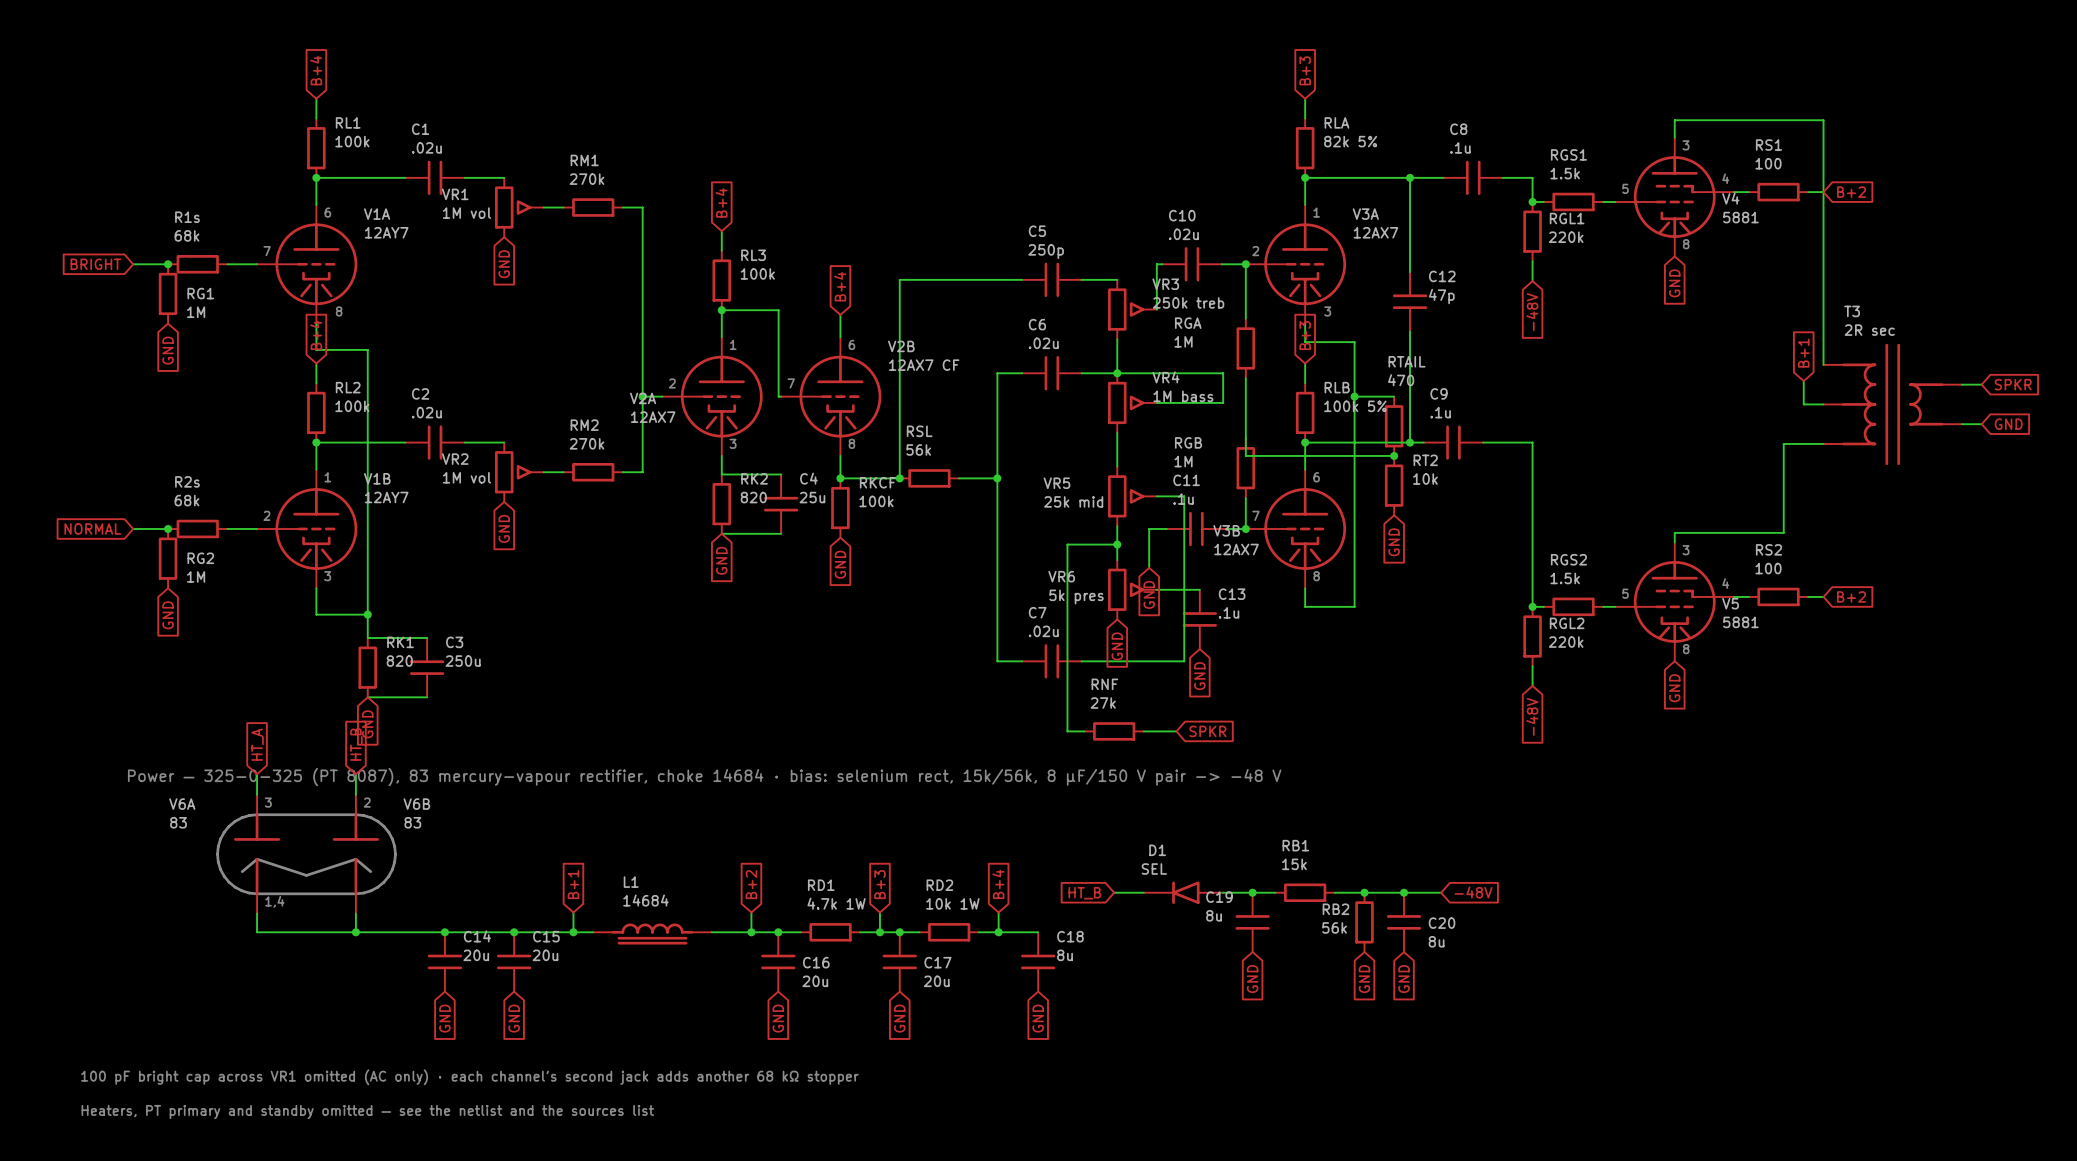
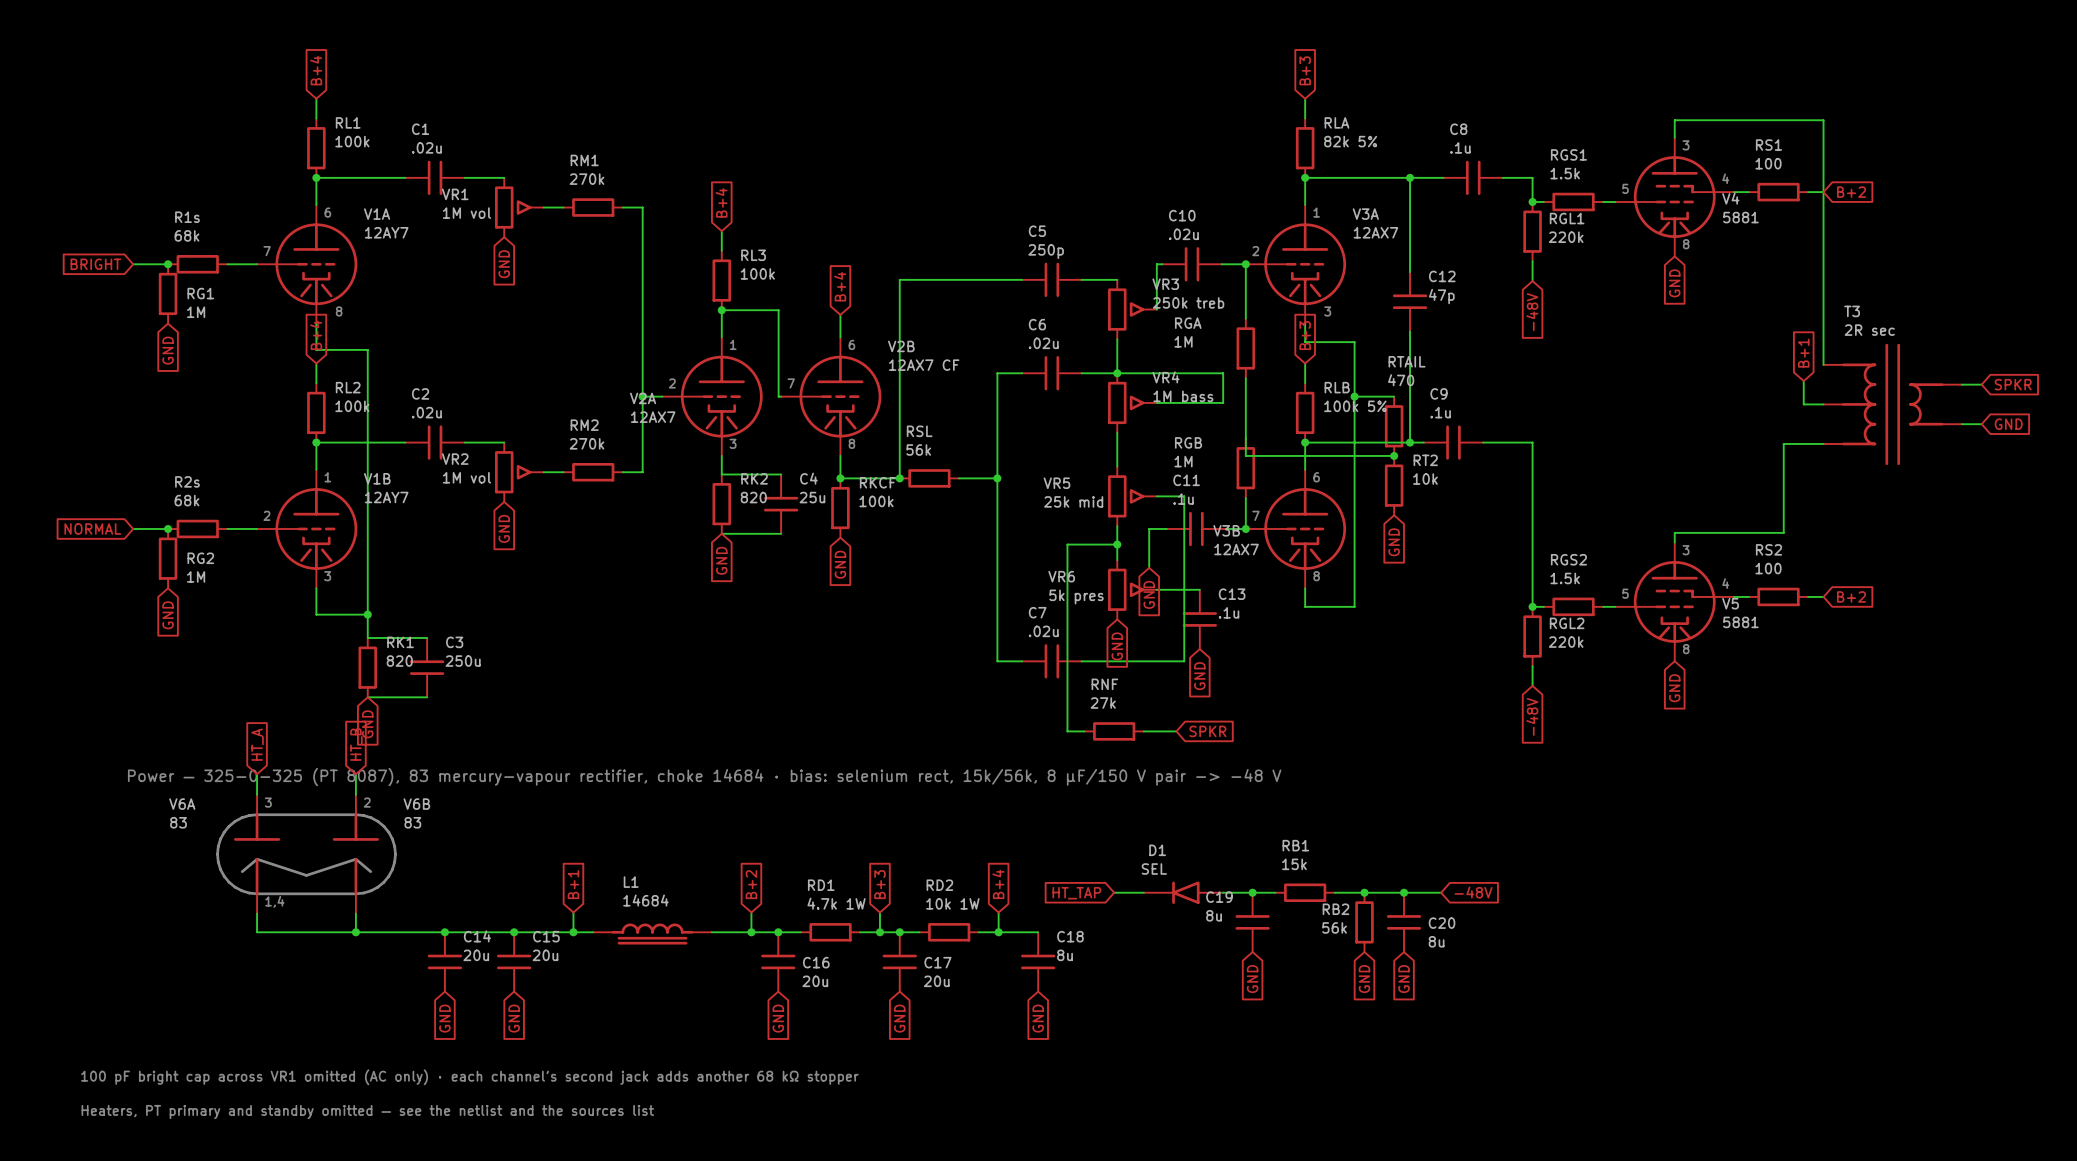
global label: HT_B (1084, 893) -> HT_TAP (1076, 893)

